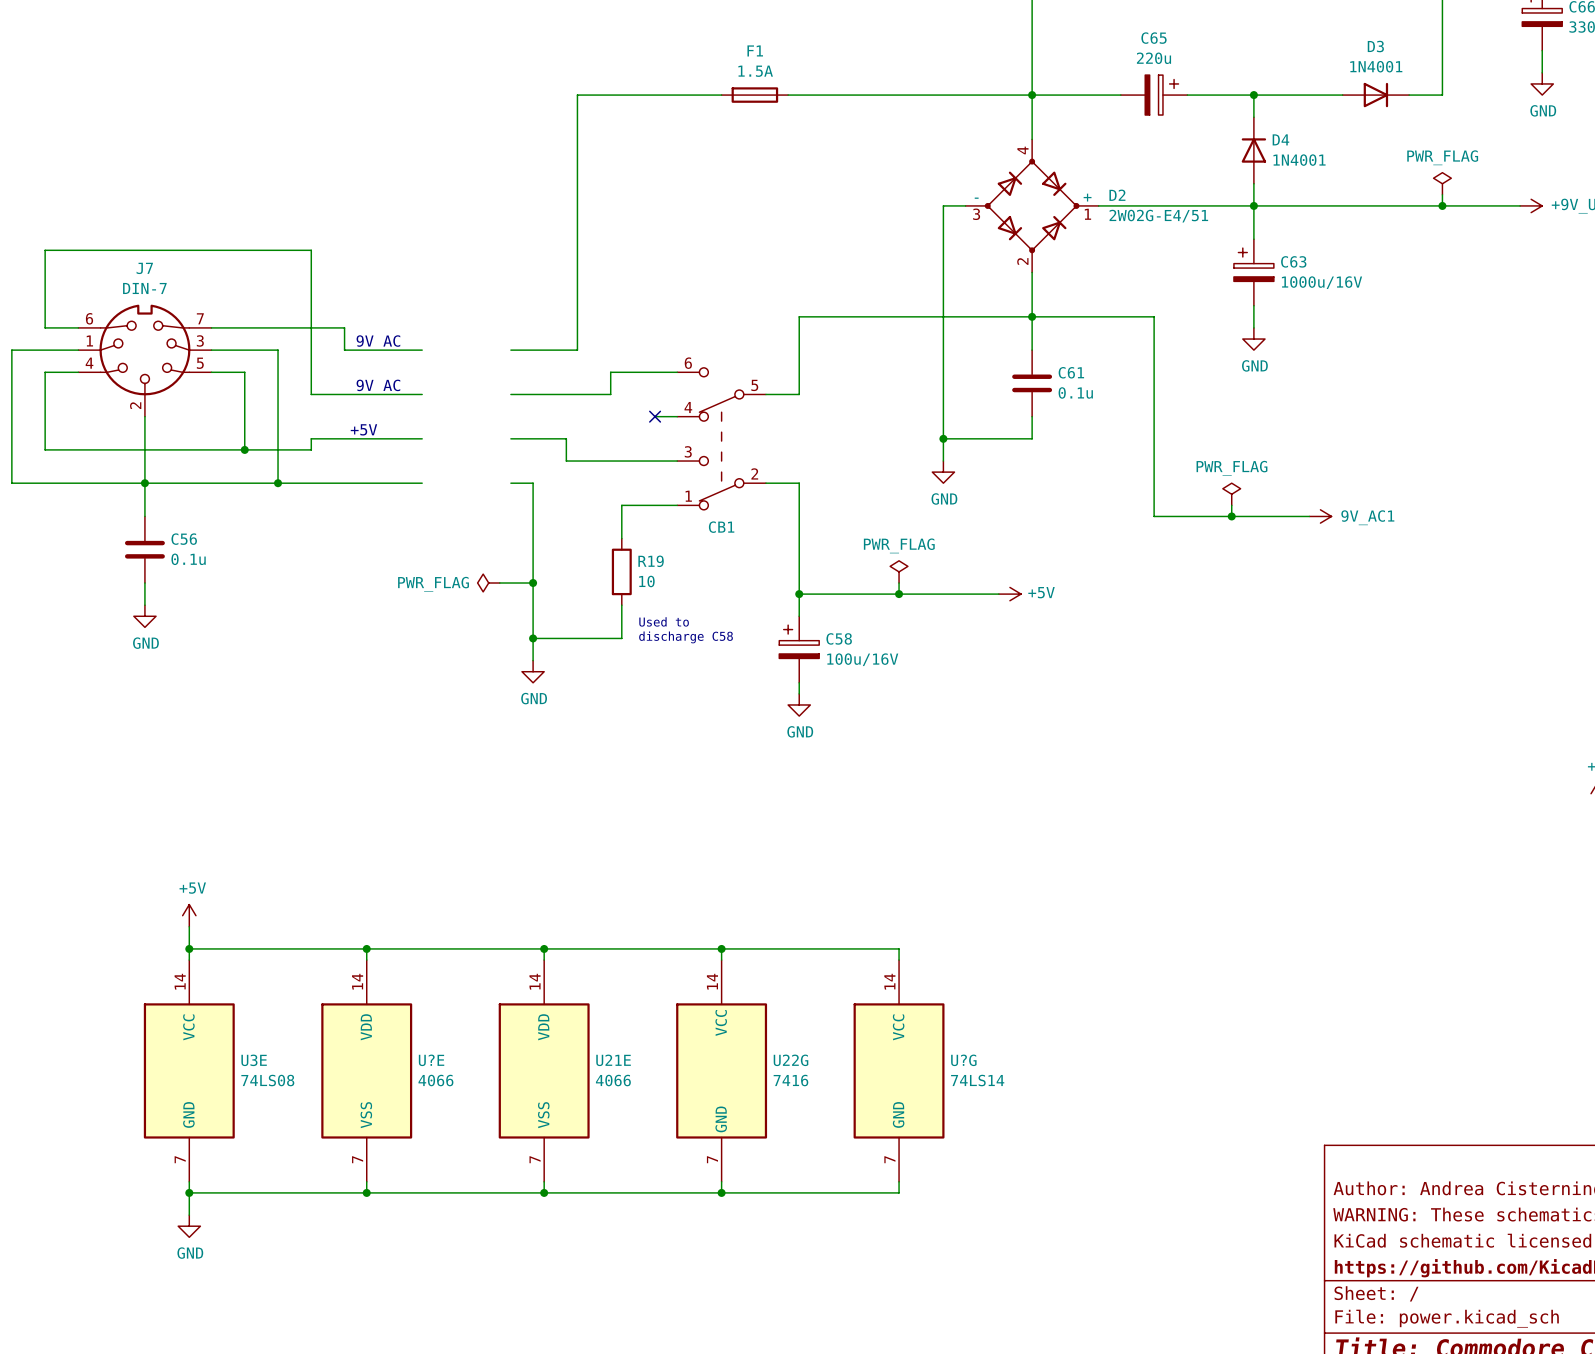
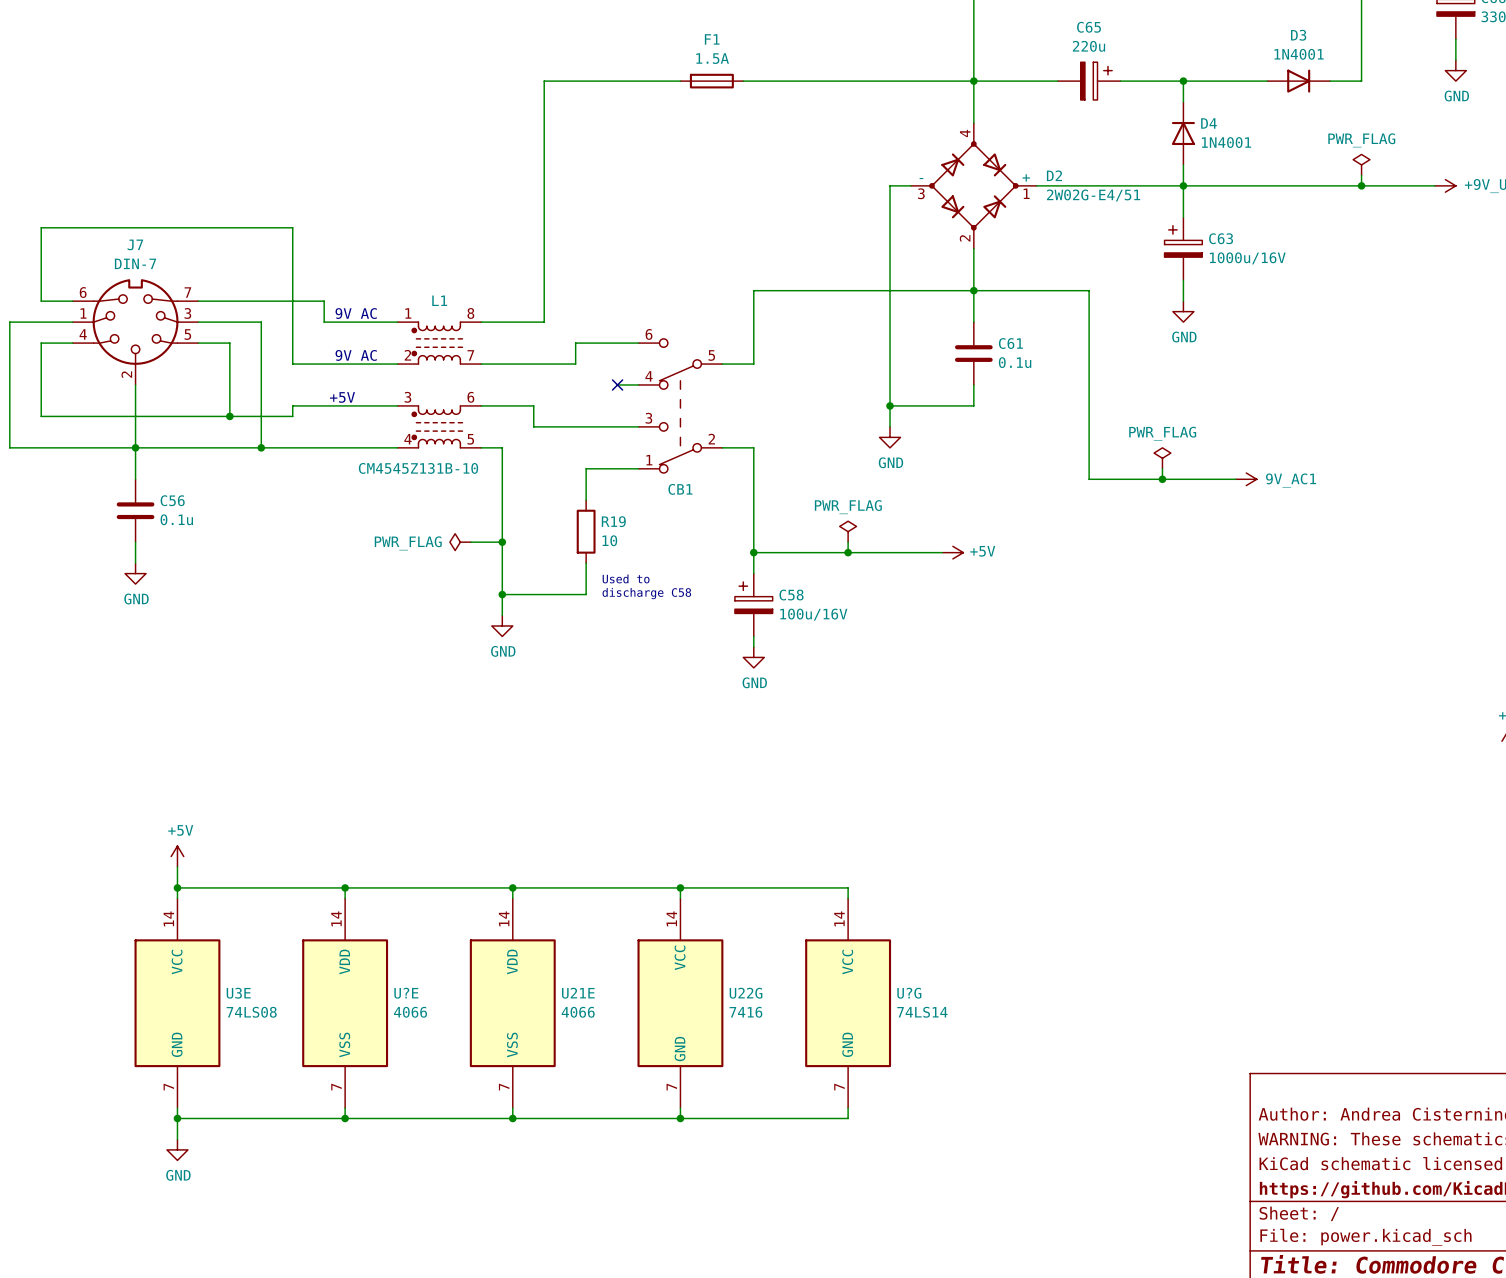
L1: none -> CM4545Z131B-10 (439, 384)

